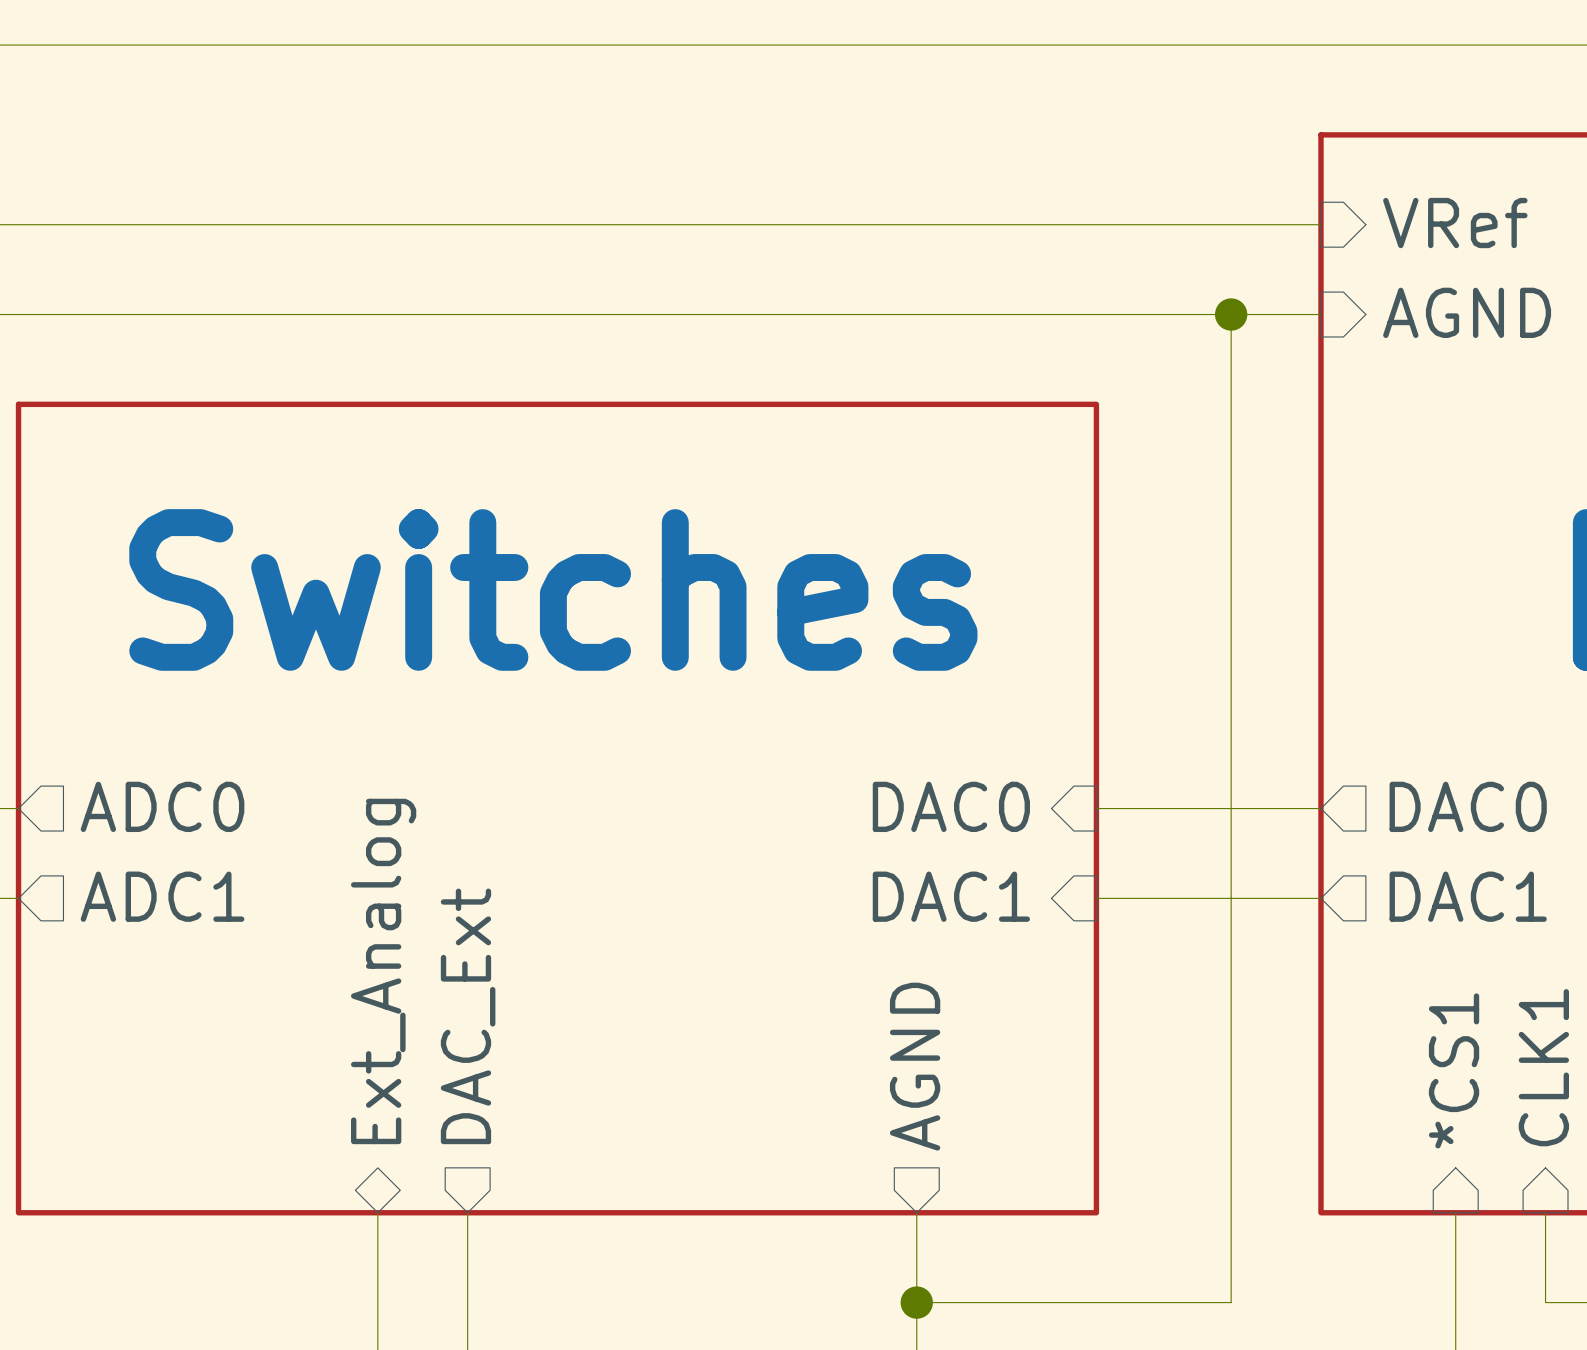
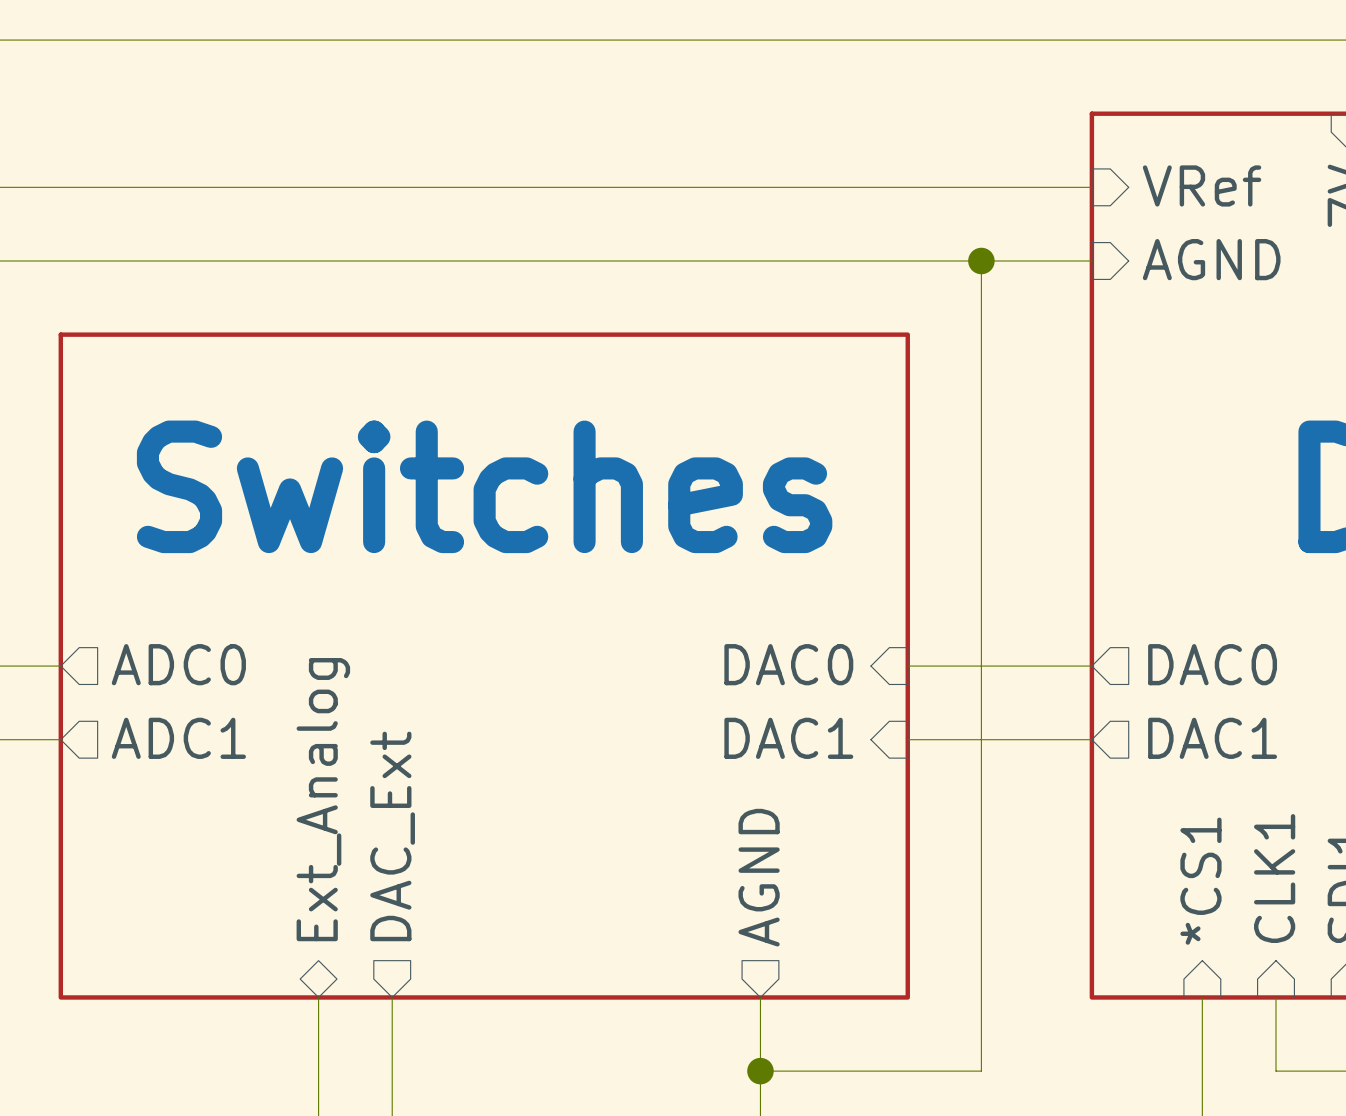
wire: (1231, 314) (1231, 1302) (1186, 1302) -> (981, 260) (981, 1071)
junction position: (1231, 314) -> (981, 260)
sheet Switches shape: [15, 401, 1100, 1216] -> [58, 332, 910, 1000]
sheet pin position: ADC0 (162, 806) -> ADC0 (178, 664)
wire: none -> (23, 666) (60, 666)
sheet pin position: ADC1 (162, 896) -> ADC1 (178, 738)
wire: none -> (23, 739) (60, 739)

